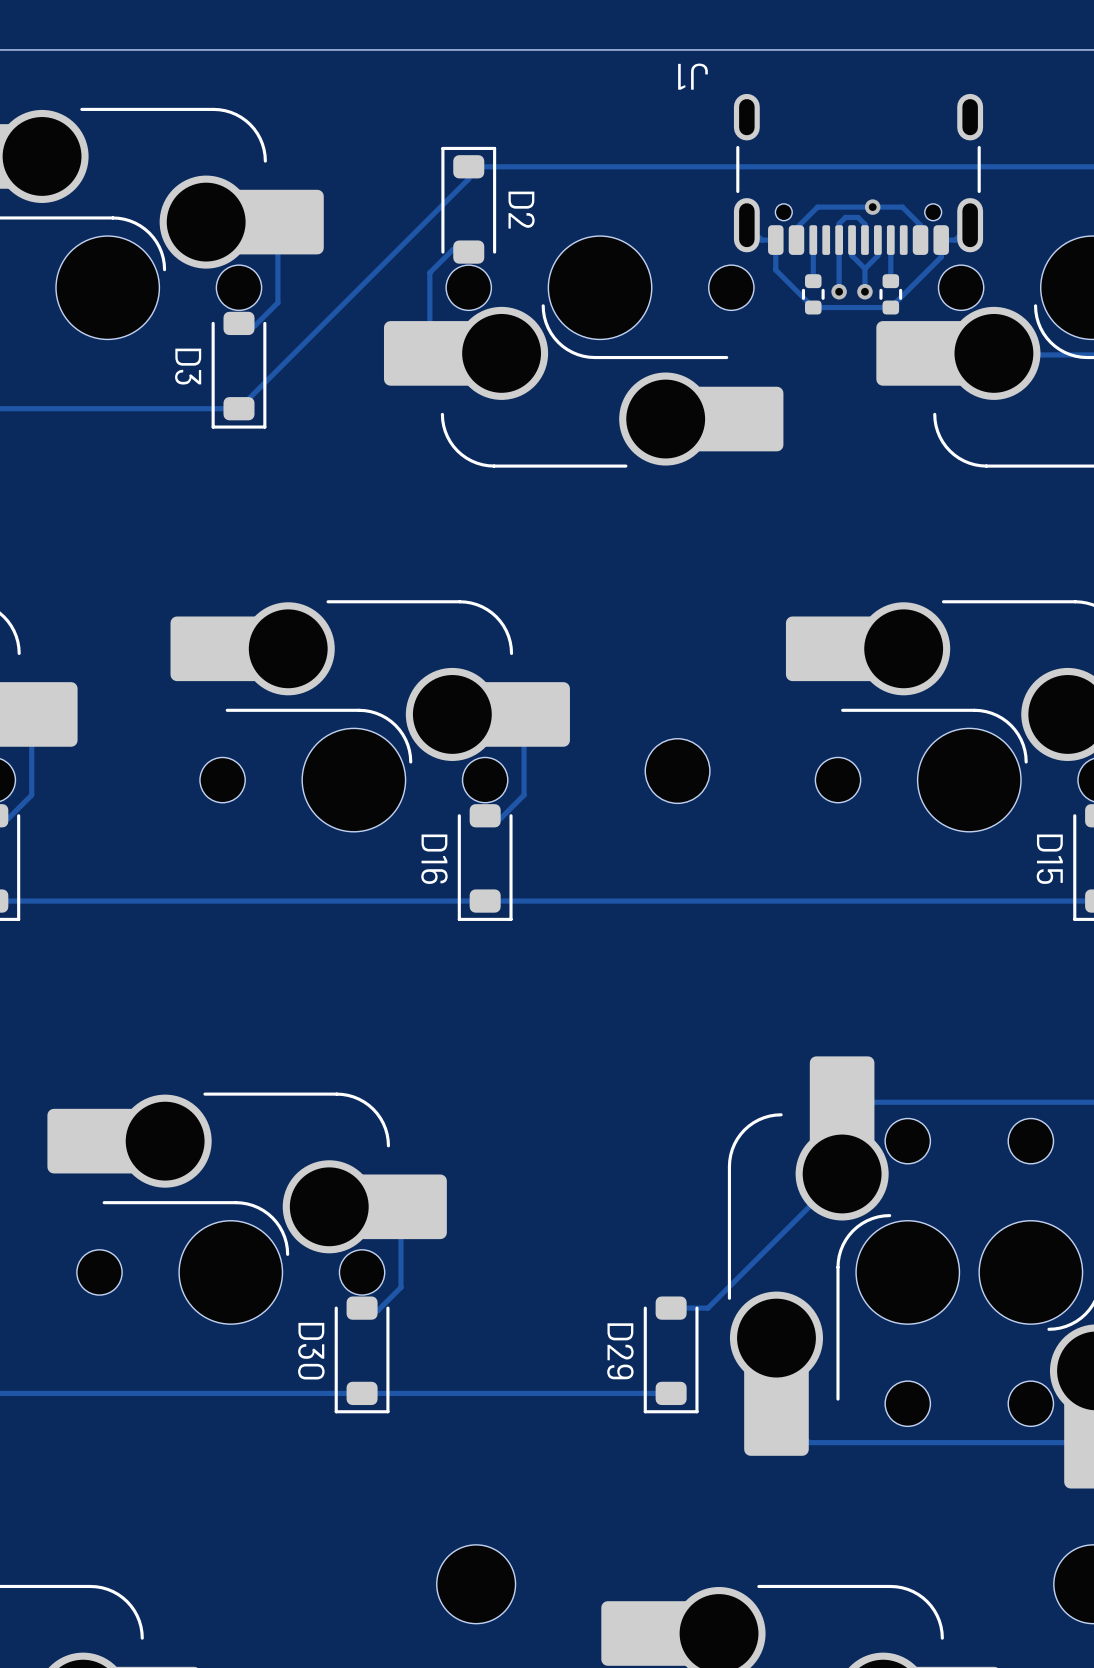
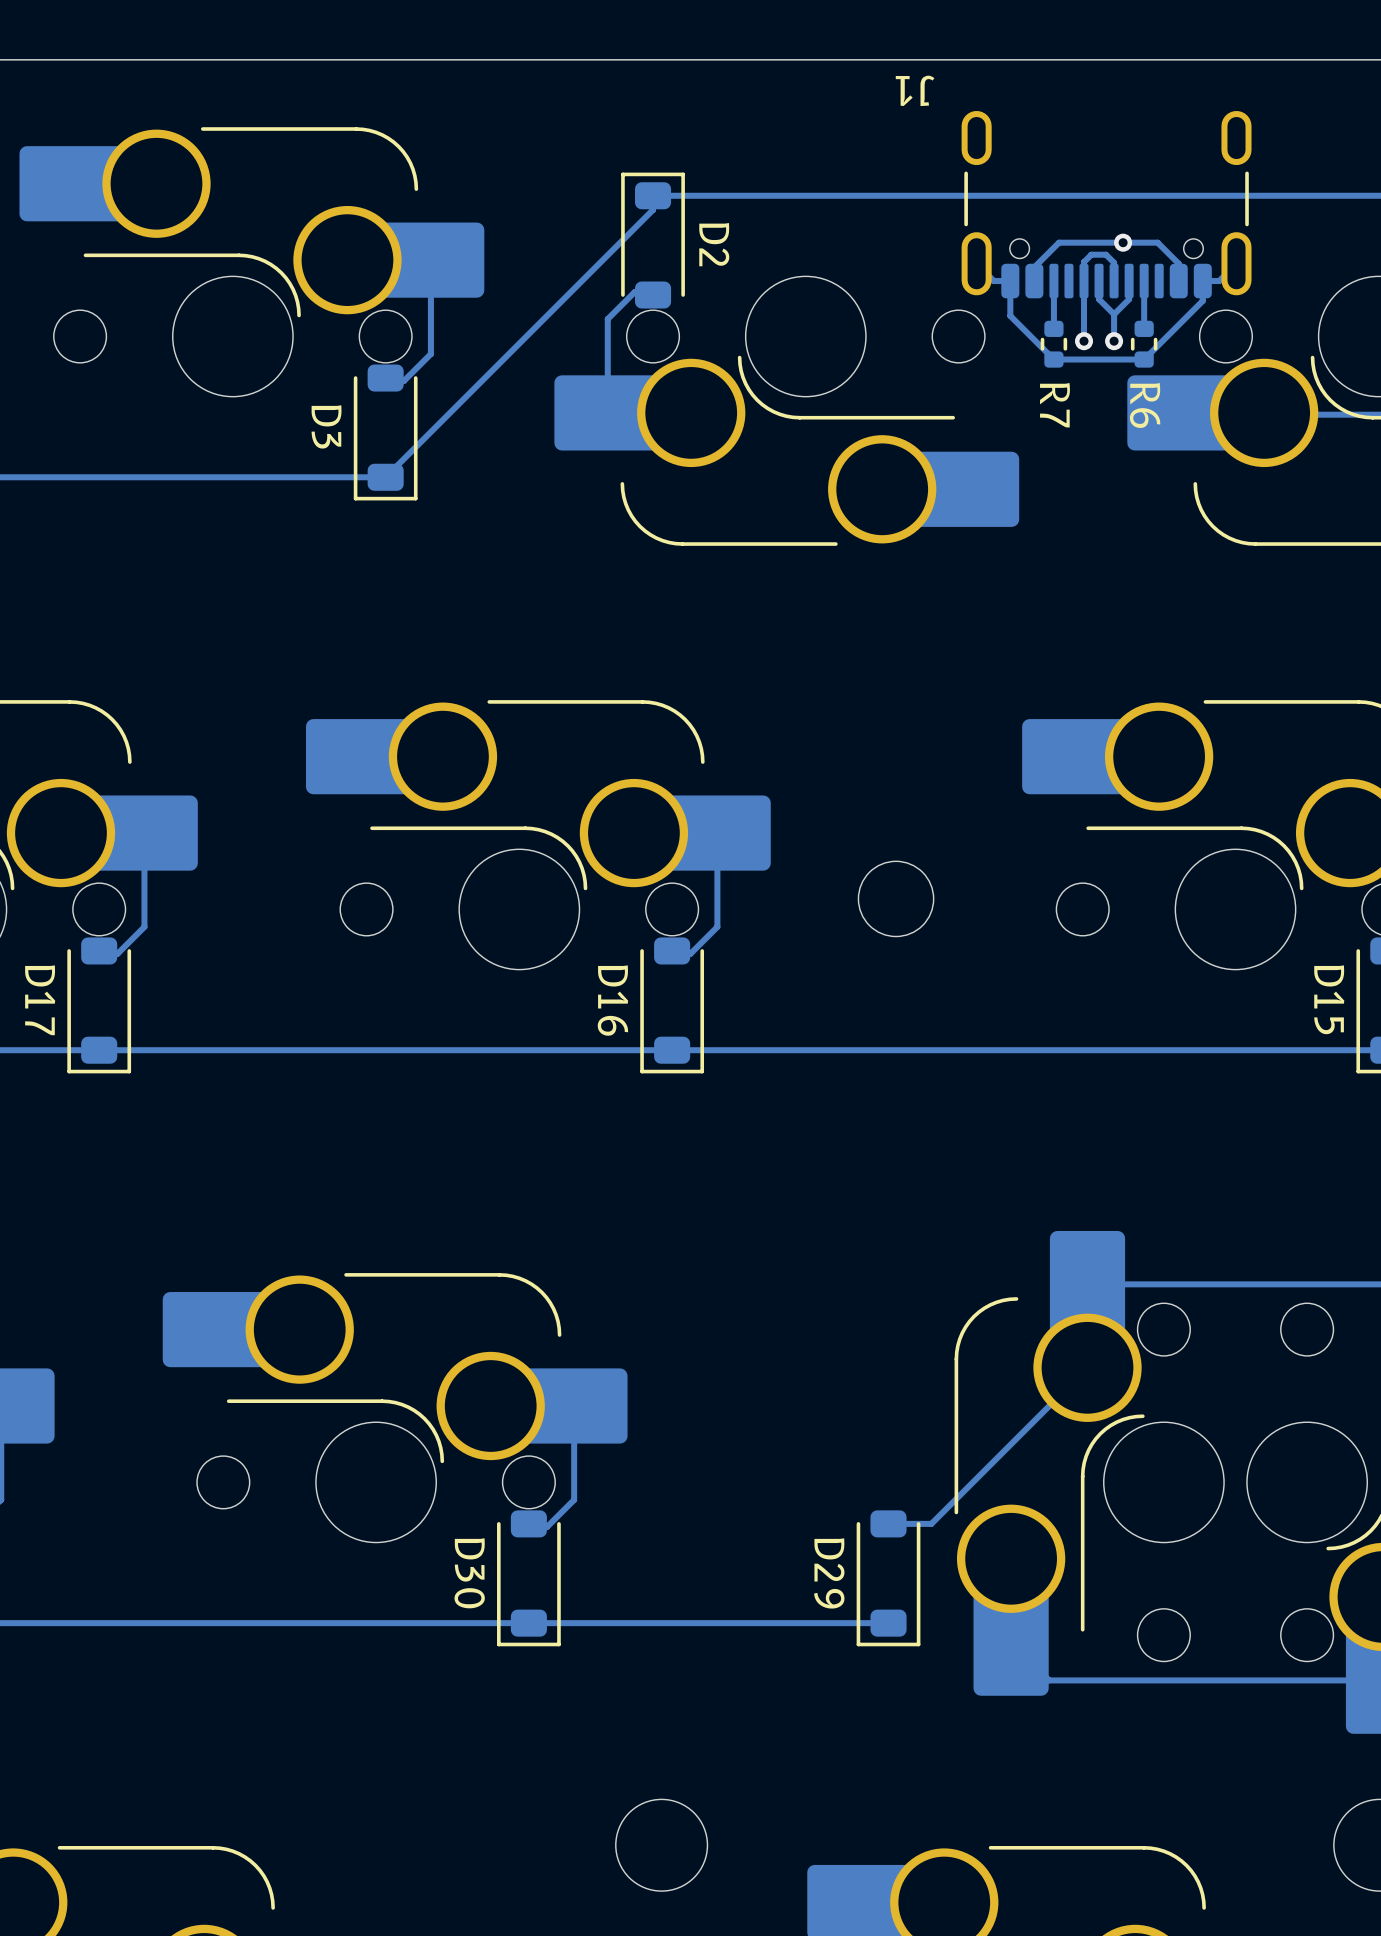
R7 name: none -> R7 (1054, 405)
R6 name: none -> R6 (1145, 405)

